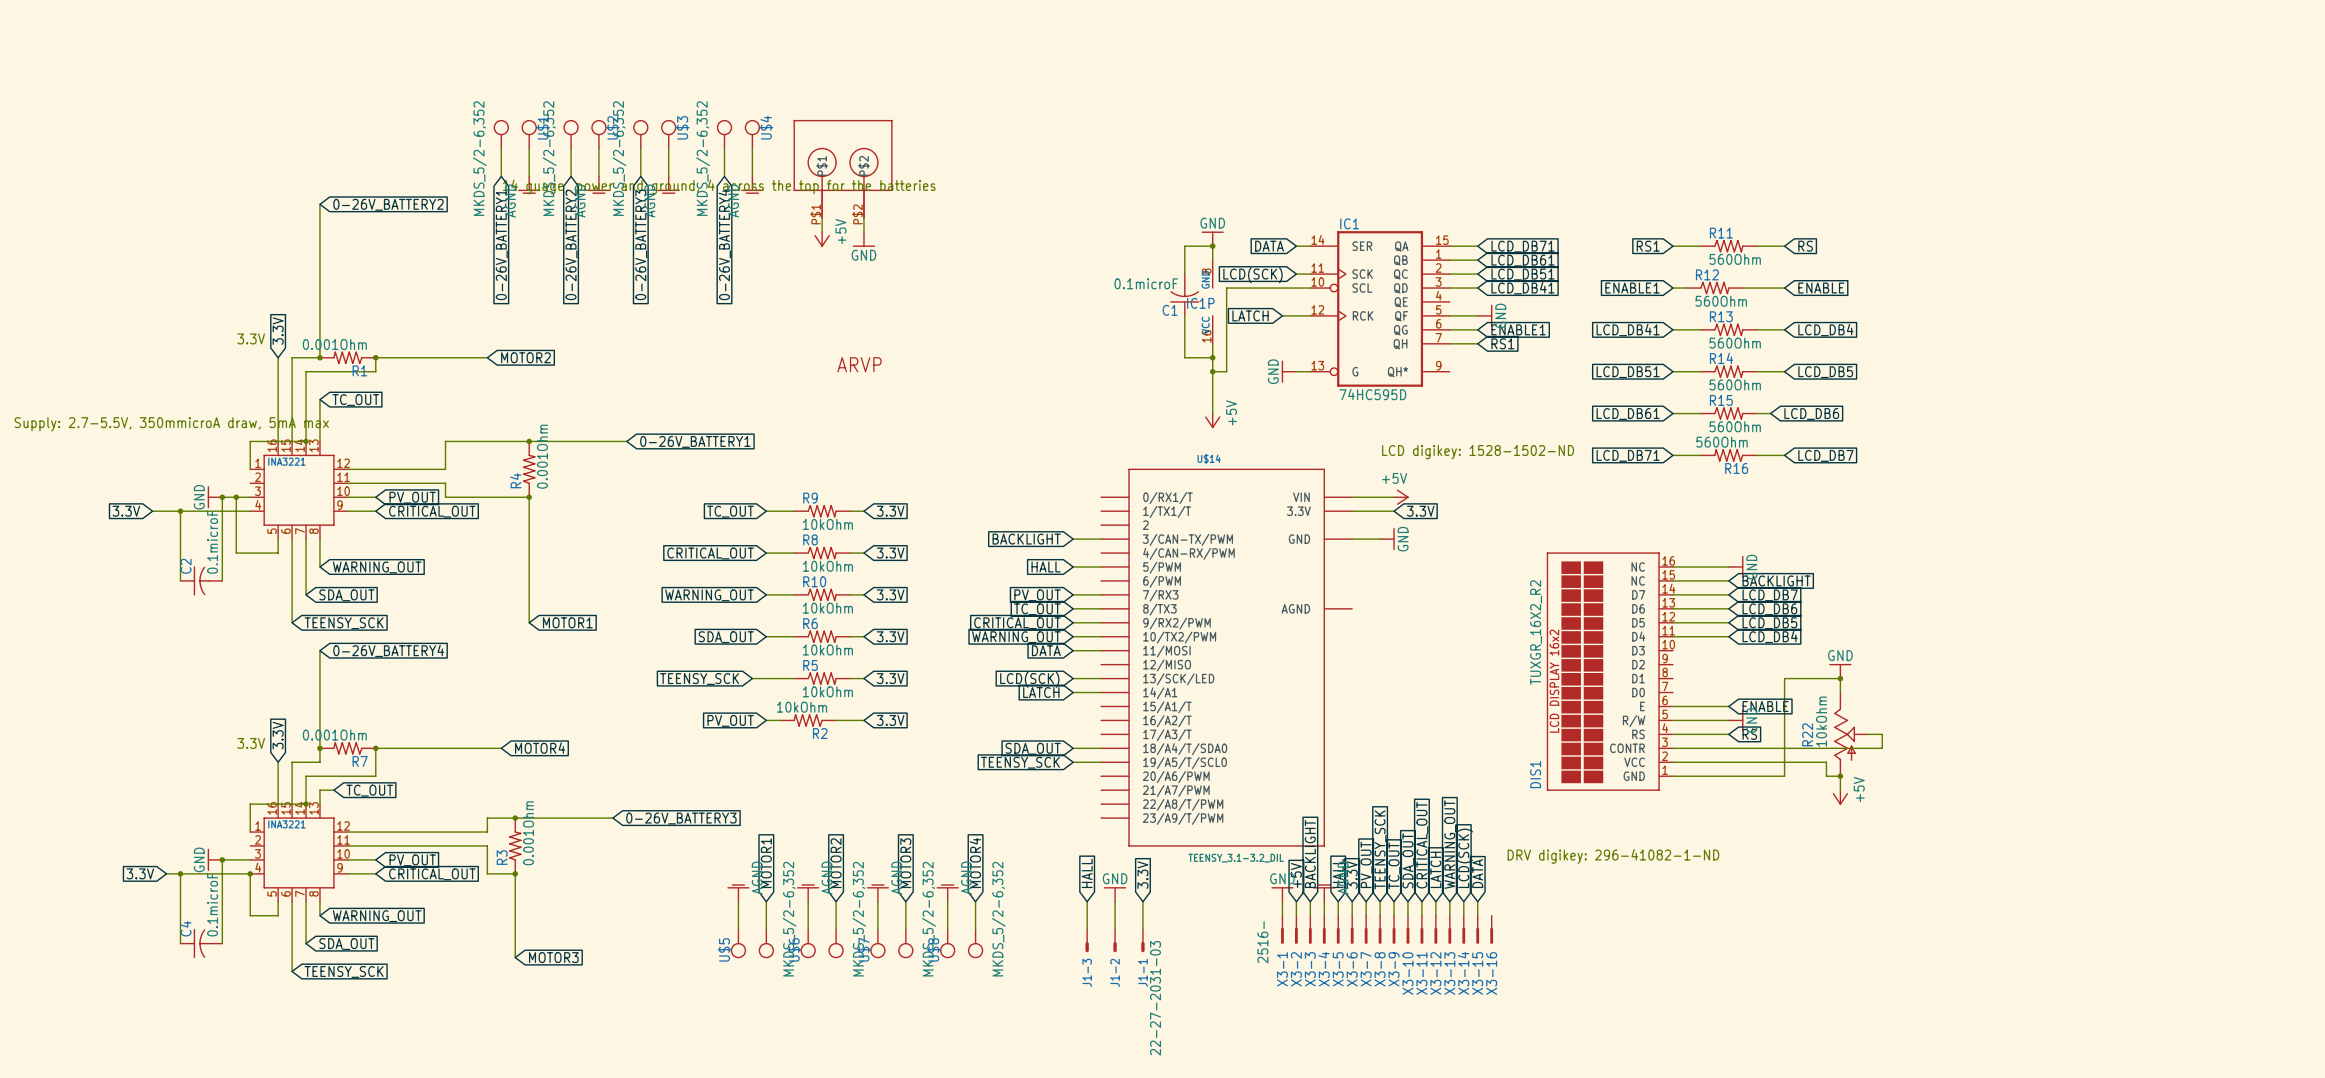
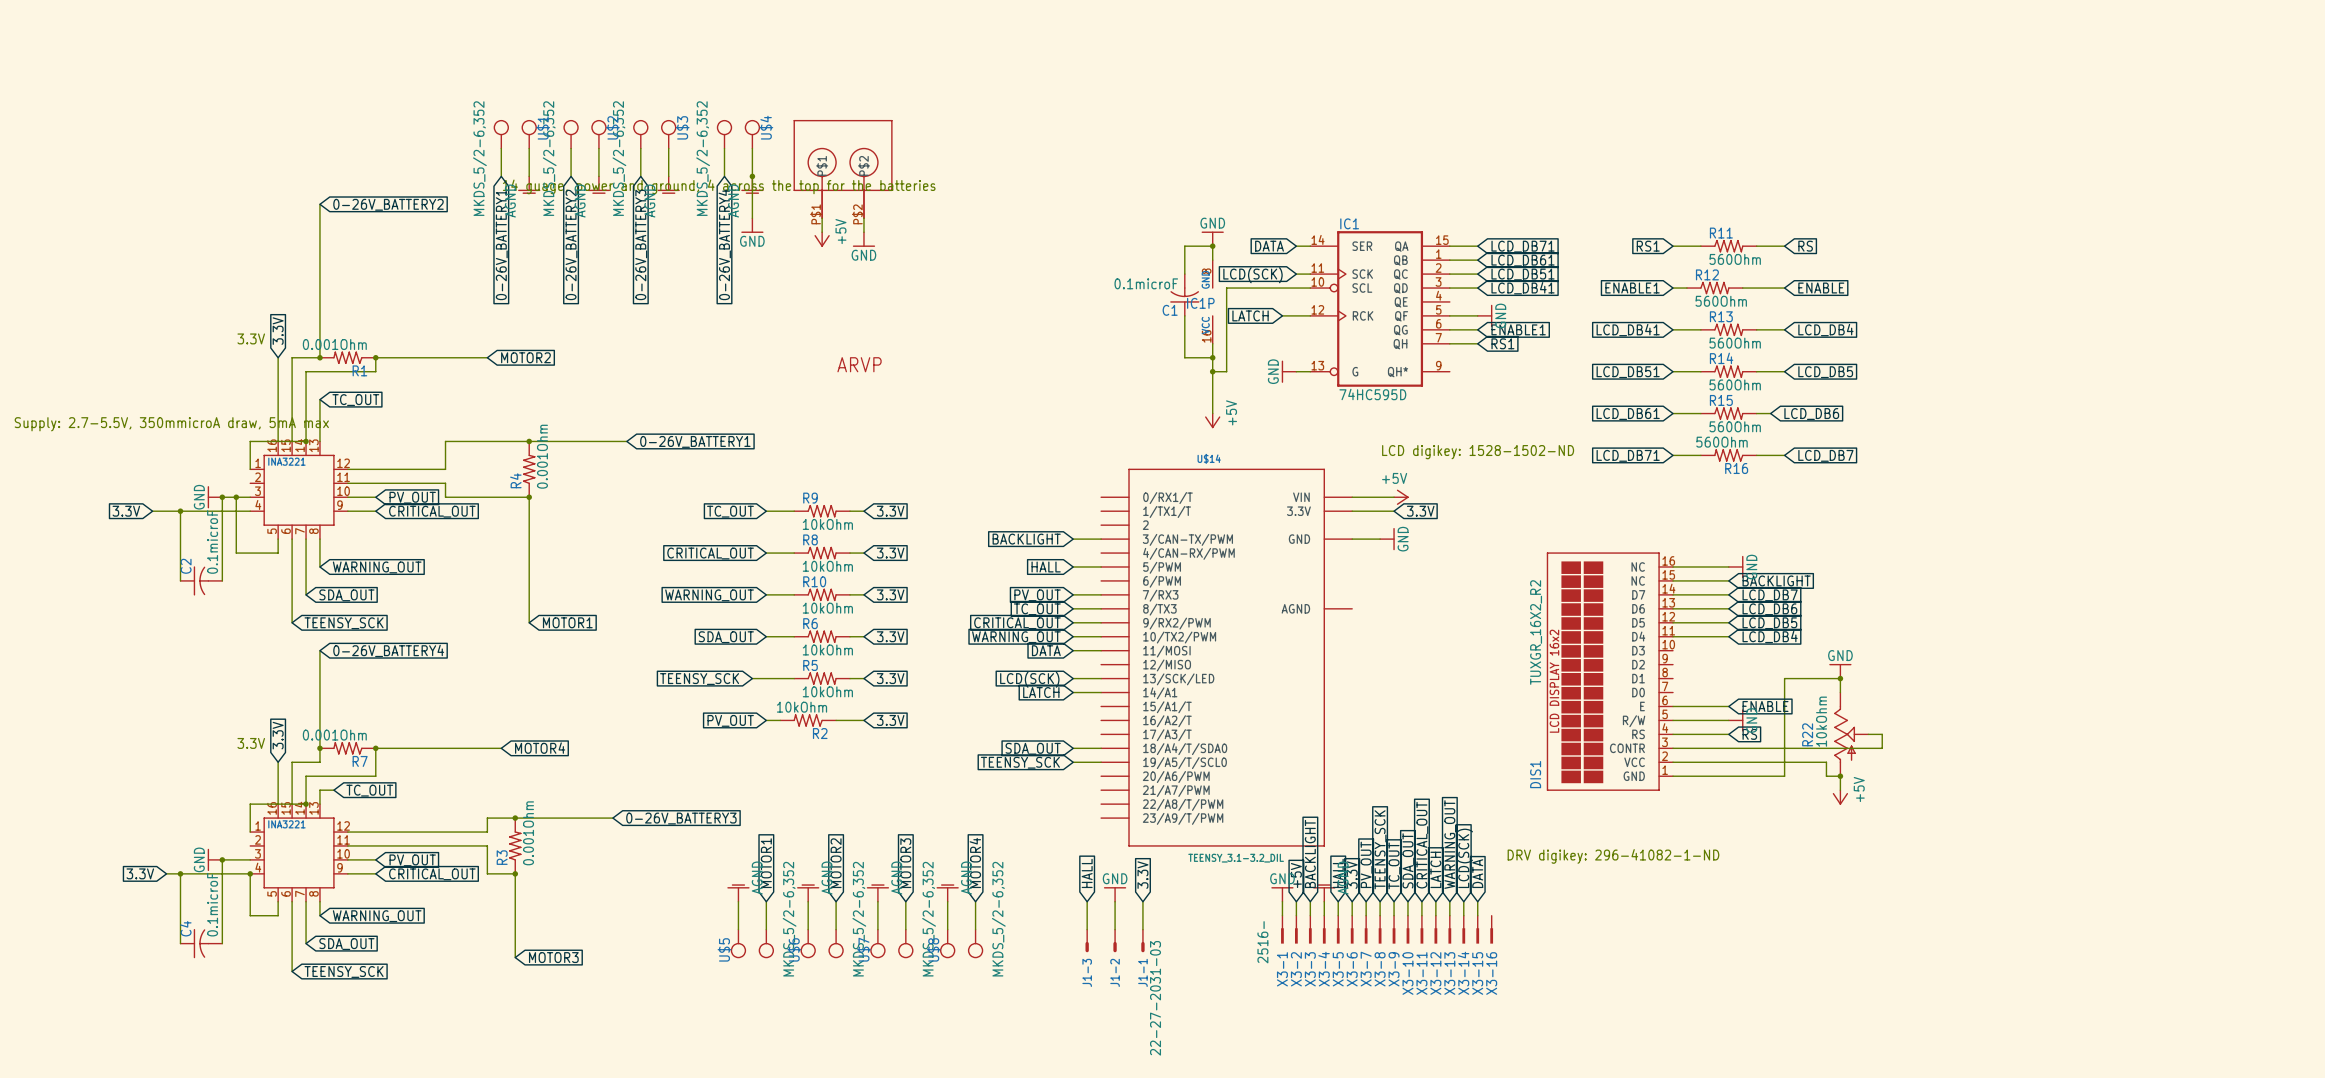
wire: none -> (752, 176) (752, 218)
junction: none -> (752, 176)
power symbol: none -> GND (752, 225)

